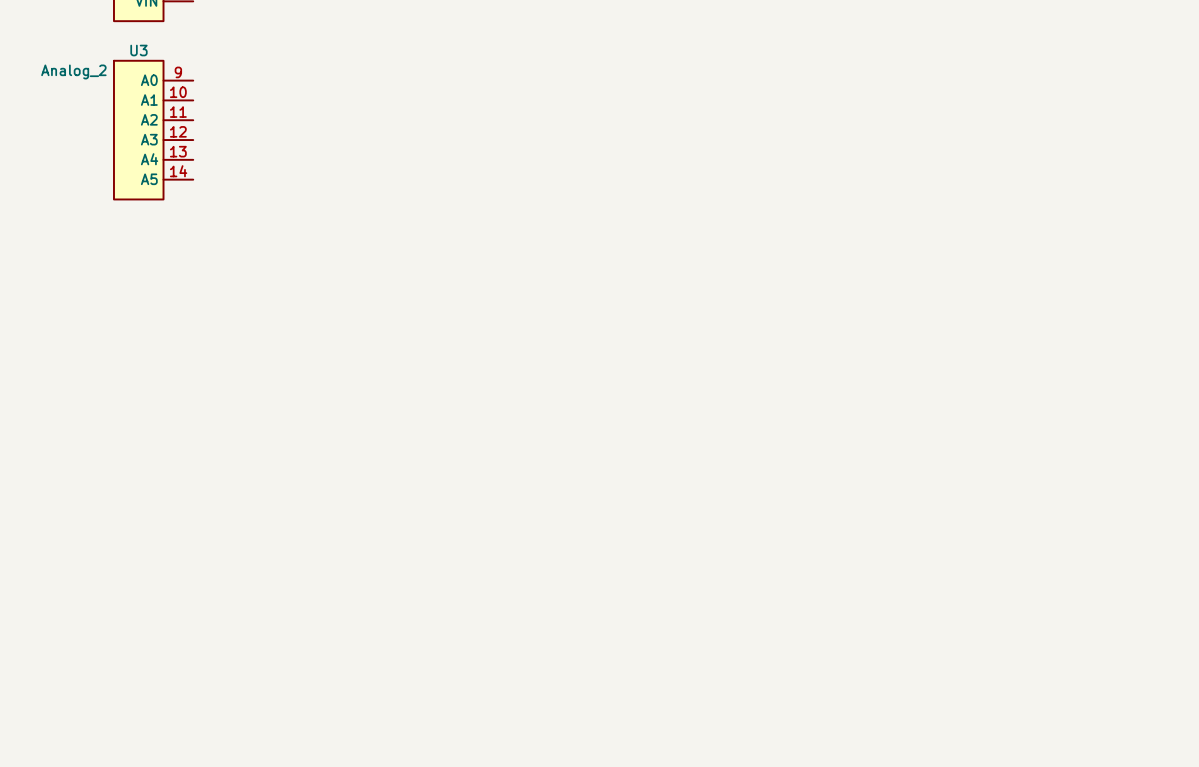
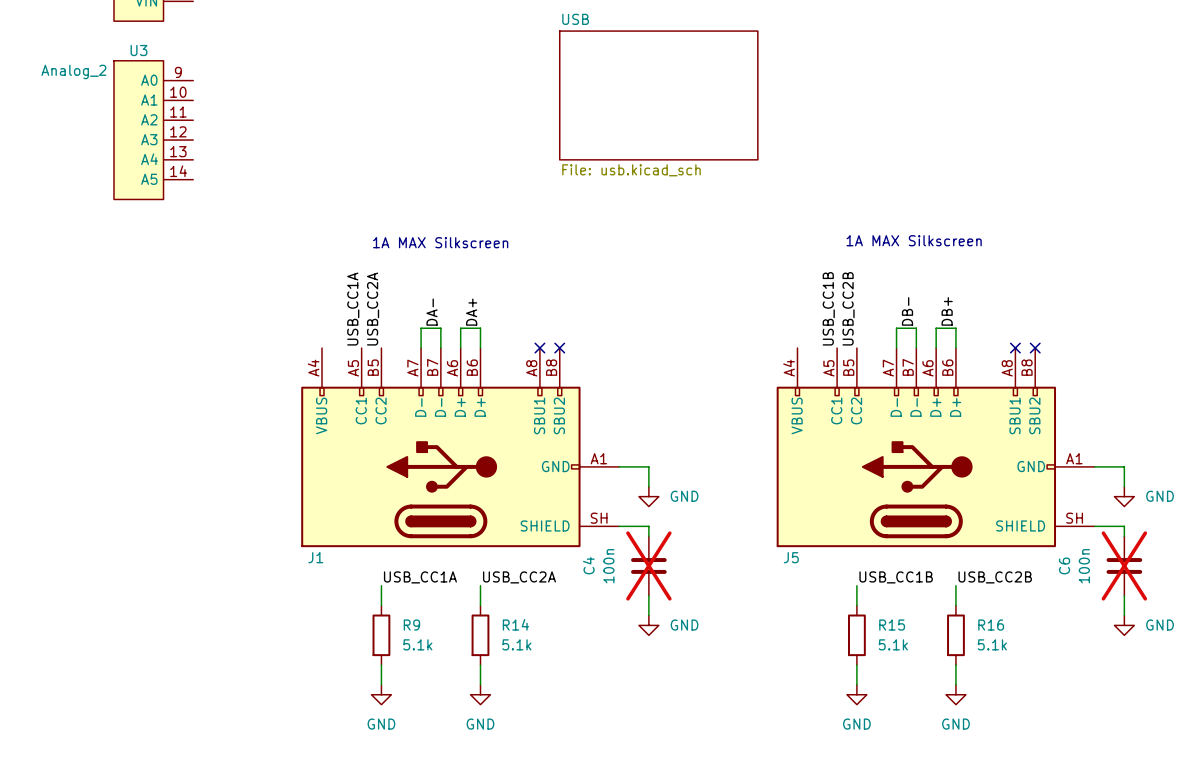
sheet USB: none -> File: usb.kicad_sch (658, 95)
text: none -> 1A MAX Silkscreen (914, 240)
text: none -> 1A MAX Silkscreen (440, 242)
label: none -> USB_CC1B (828, 308)
label: none -> USB_CC2B (848, 308)
label: none -> USB_CC1A (353, 309)
label: none -> USB_CC2A (373, 309)
label: none -> DB- (907, 311)
label: none -> DB+ (947, 311)
label: none -> DA- (432, 312)
label: none -> DA+ (471, 312)
wire: none -> (421, 348) (421, 328) (440, 328) (440, 348)
wire: none -> (460, 348) (460, 328) (480, 328) (480, 348)
no-connect mark: none -> (539, 348)
no-connect mark: none -> (559, 348)
wire: none -> (896, 348) (896, 328) (916, 328) (916, 348)
wire: none -> (936, 348) (936, 328) (955, 328) (955, 348)
no-connect mark: none -> (1015, 348)
no-connect mark: none -> (1035, 348)
J1: none -> (460, 447)
J5: none -> (935, 447)
wire: none -> (619, 466) (648, 466) (648, 486)
wire: none -> (1094, 466) (1124, 466) (1124, 486)
power symbol: none -> GND (648, 496)
power symbol: none -> GND (1124, 496)
wire: none -> (619, 526) (648, 526) (648, 536)
wire: none -> (1094, 526) (1124, 526) (1124, 536)
C4: none -> 100n (648, 565)
C6: none -> 100n (1124, 565)
label: none -> USB_CC1A (420, 577)
label: none -> USB_CC2A (519, 577)
label: none -> USB_CC1B (896, 577)
label: none -> USB_CC2B (995, 577)
wire: none -> (381, 585) (381, 605)
wire: none -> (480, 585) (480, 605)
wire: none -> (856, 585) (856, 605)
wire: none -> (955, 585) (955, 605)
wire: none -> (648, 595) (648, 615)
wire: none -> (1124, 595) (1124, 615)
power symbol: none -> GND (648, 625)
power symbol: none -> GND (1124, 625)
R9: none -> 5.1k (381, 635)
R14: none -> 5.1k (480, 635)
R15: none -> 5.1k (856, 635)
R16: none -> 5.1k (955, 635)
wire: none -> (381, 665) (381, 684)
wire: none -> (480, 665) (480, 684)
wire: none -> (856, 665) (856, 684)
wire: none -> (955, 665) (955, 684)
power symbol: none -> GND (381, 694)
power symbol: none -> GND (480, 694)
power symbol: none -> GND (856, 694)
power symbol: none -> GND (955, 694)

